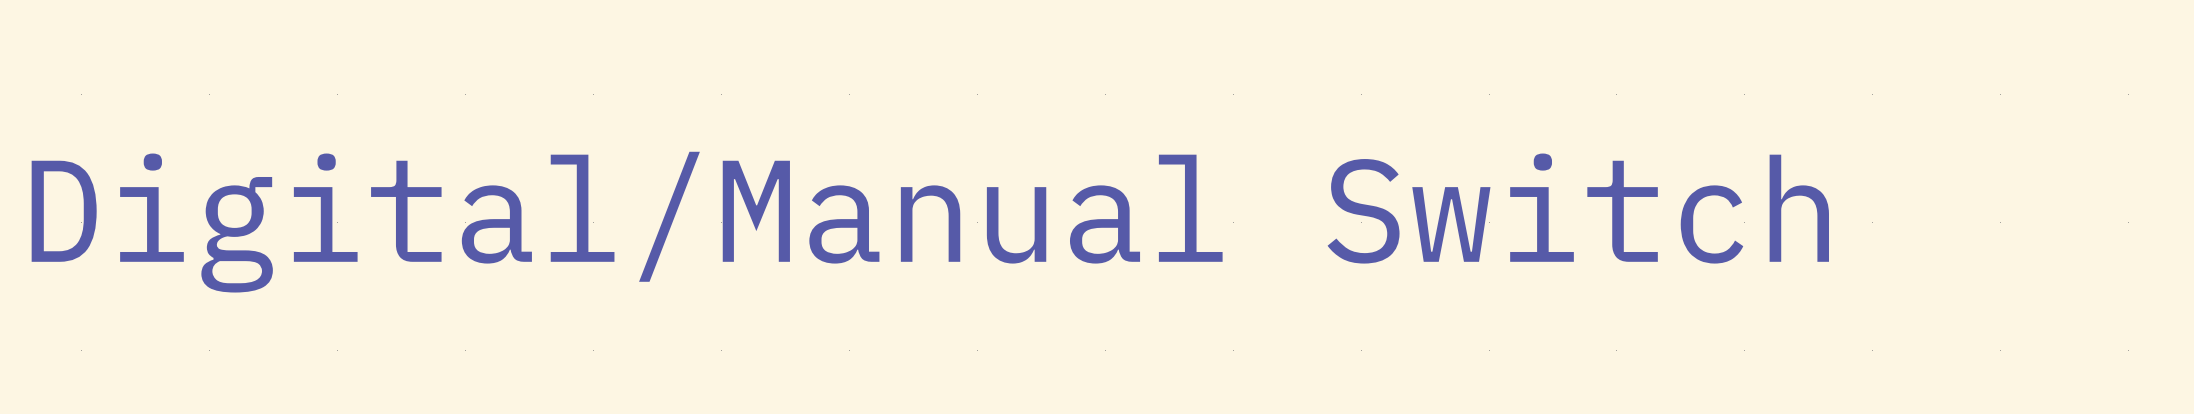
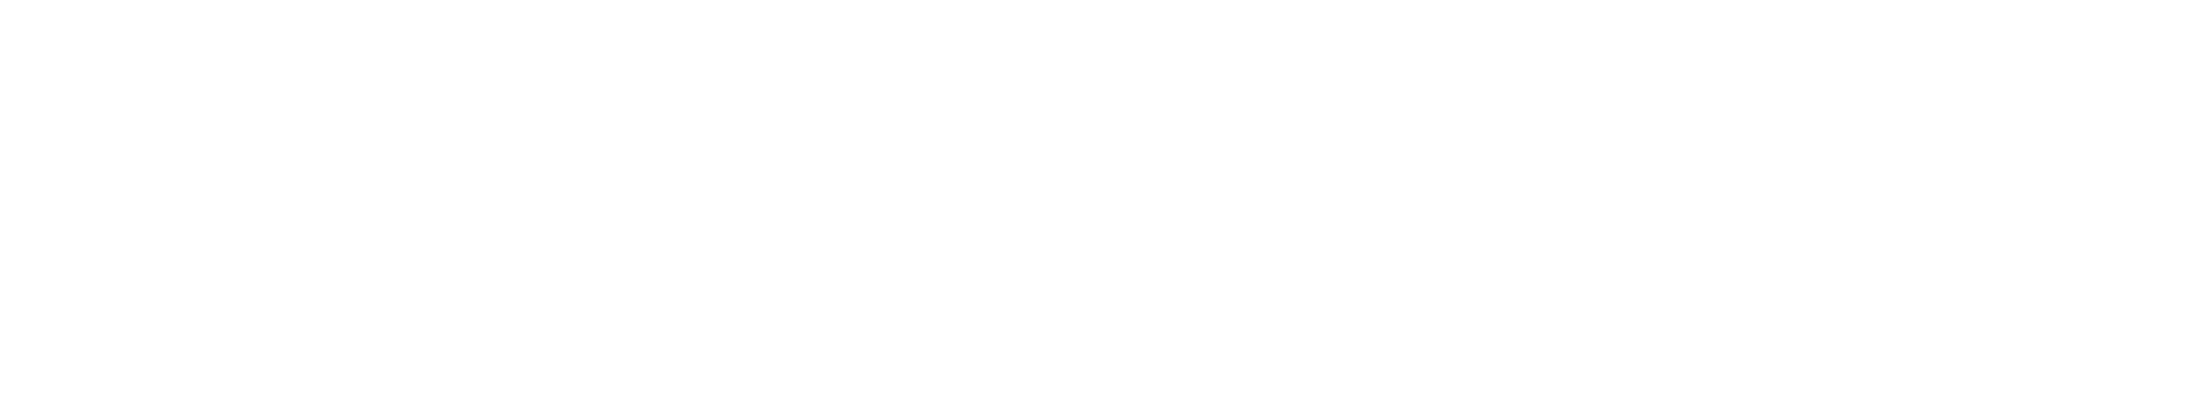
text: Digital/Manual Switch (930, 222) -> none

